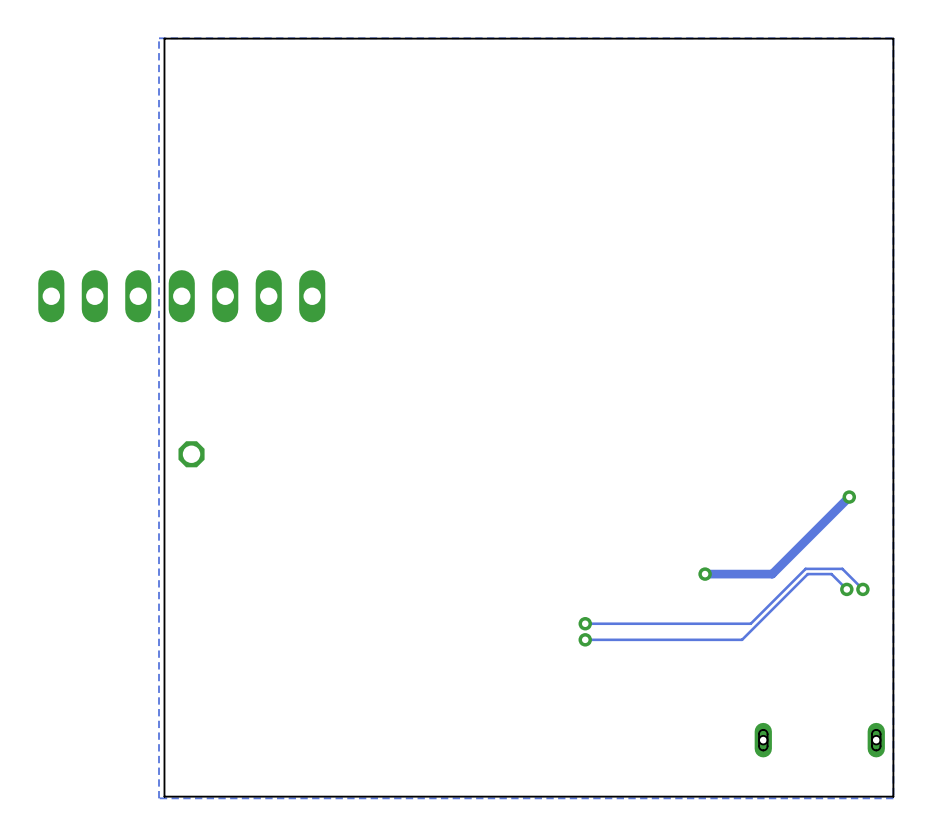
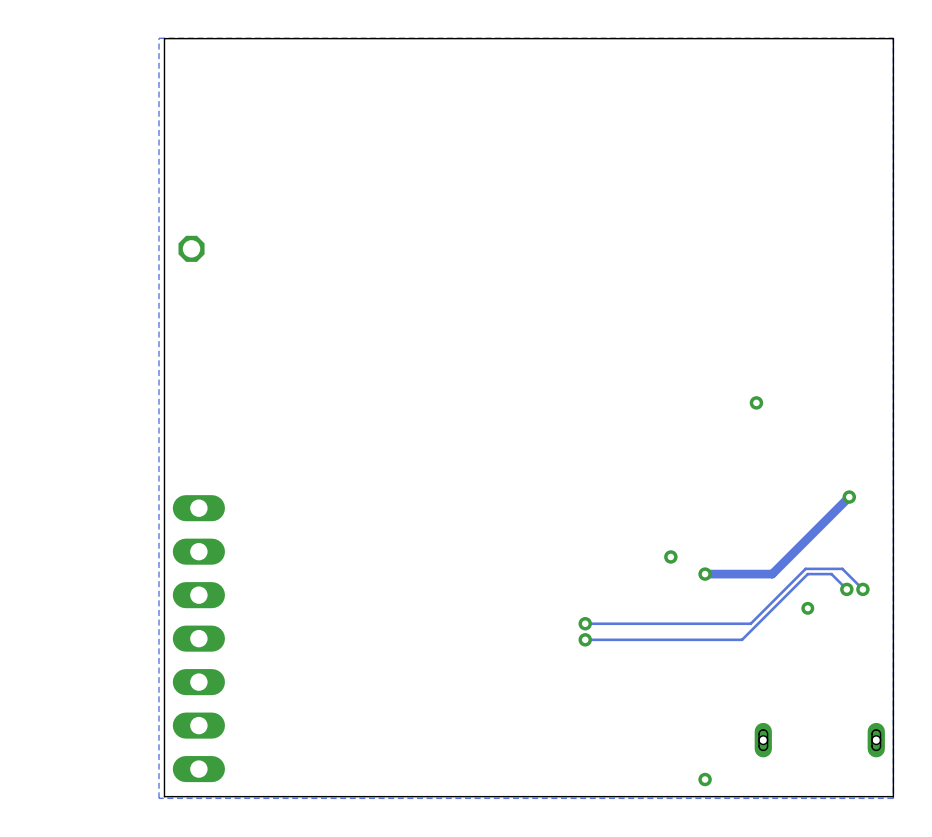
part rotation: 0° (181, 296) -> 90° clockwise (198, 638)
part position: (181, 296) -> (198, 638)
via: none -> (756, 402)
part position: (191, 454) -> (191, 248)
via: none -> (670, 556)
via: none -> (807, 608)
via: none -> (705, 779)

